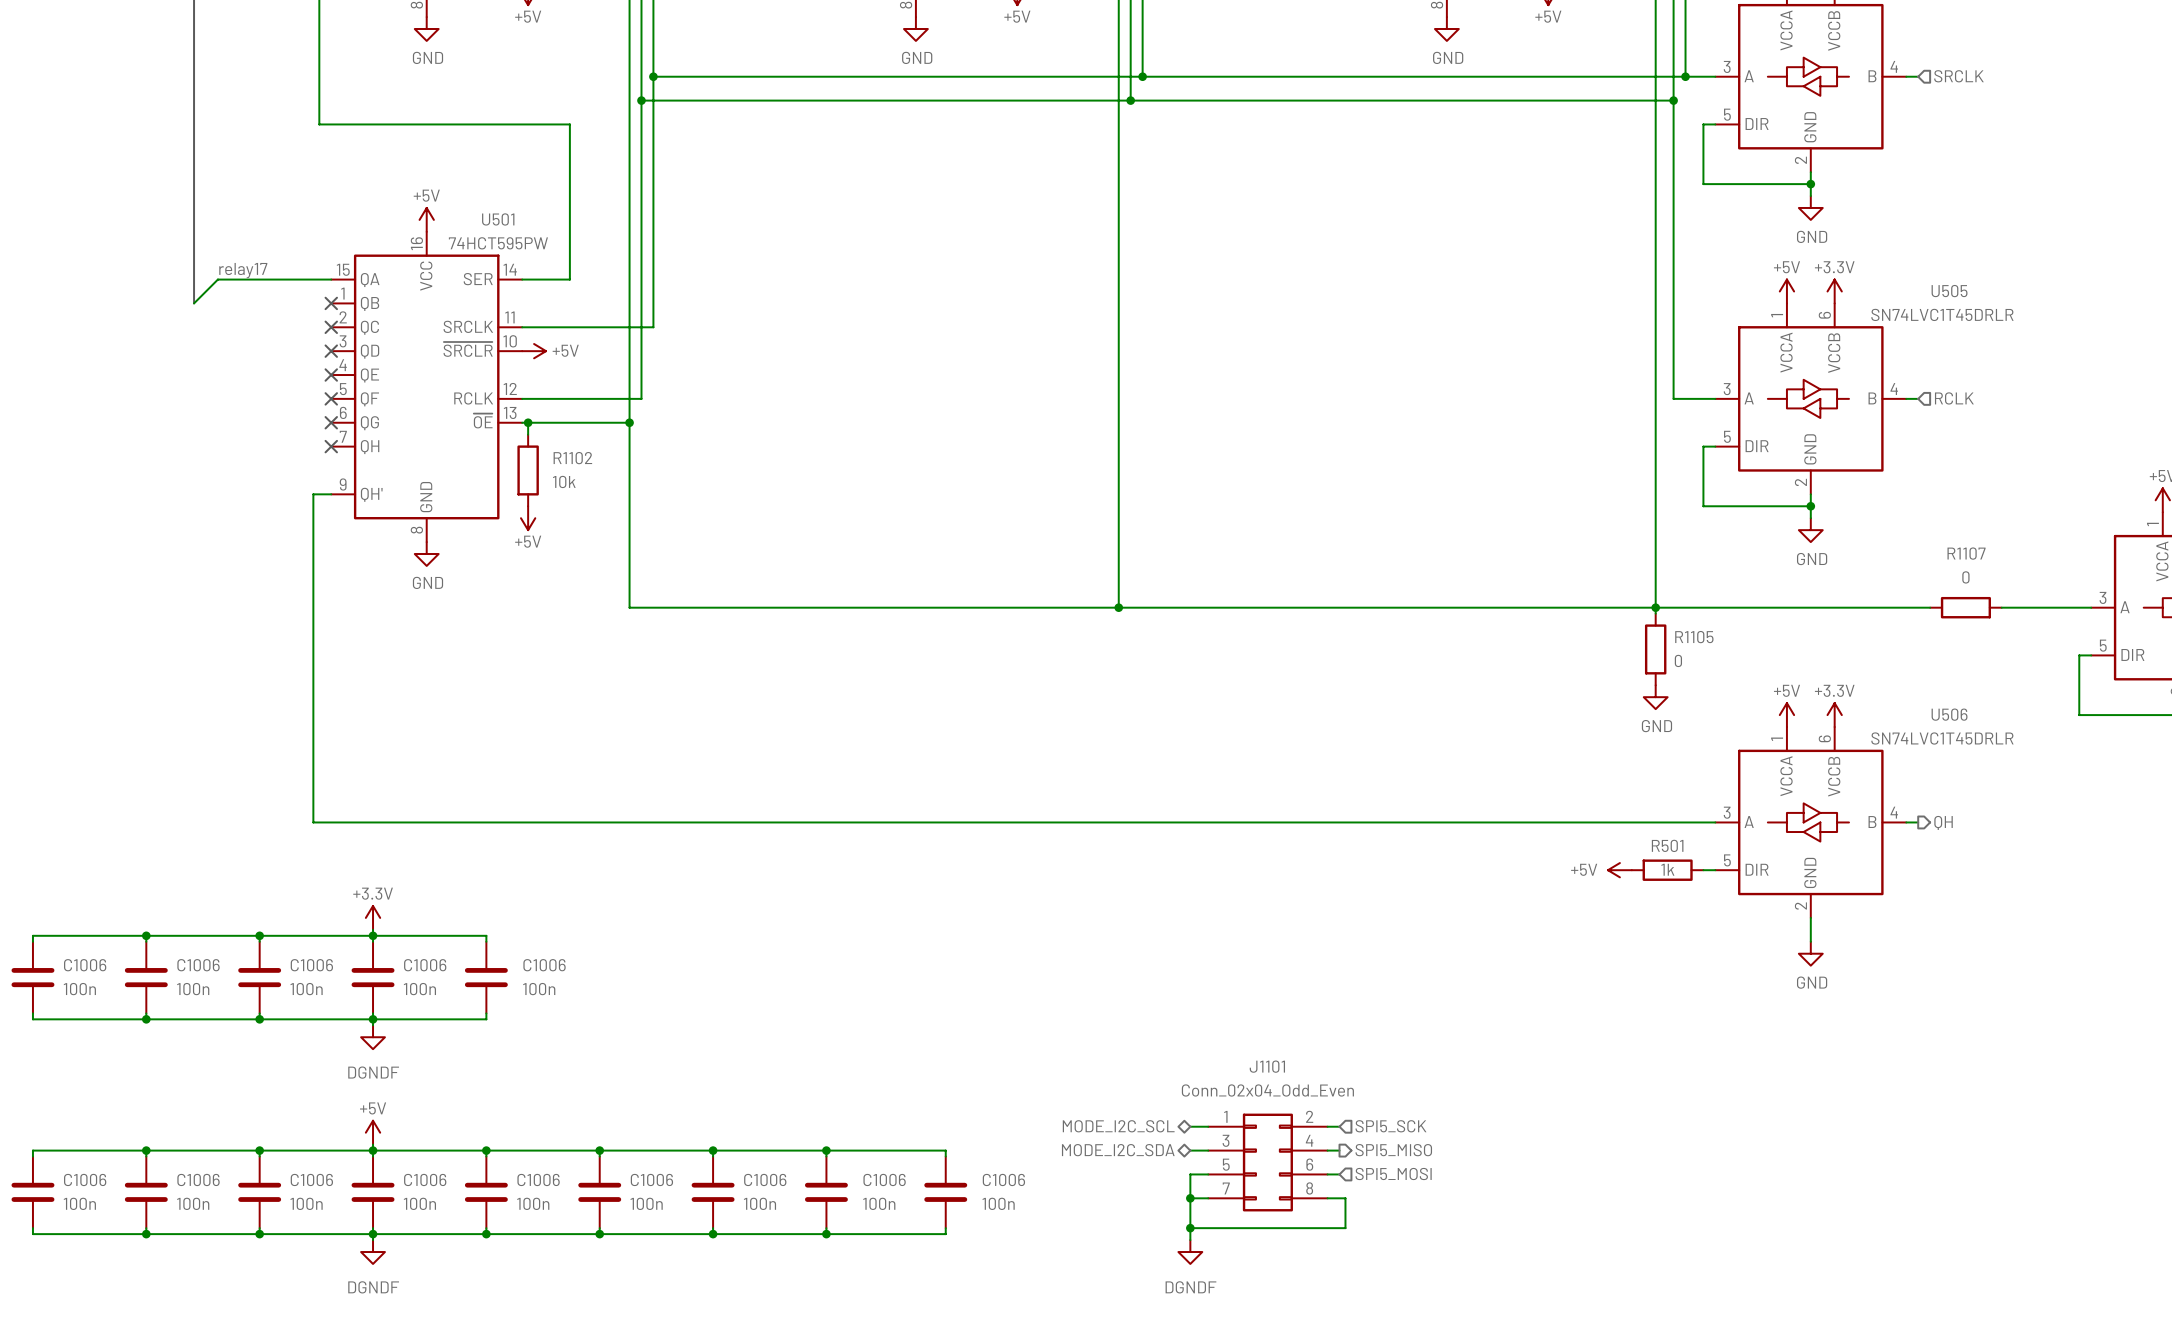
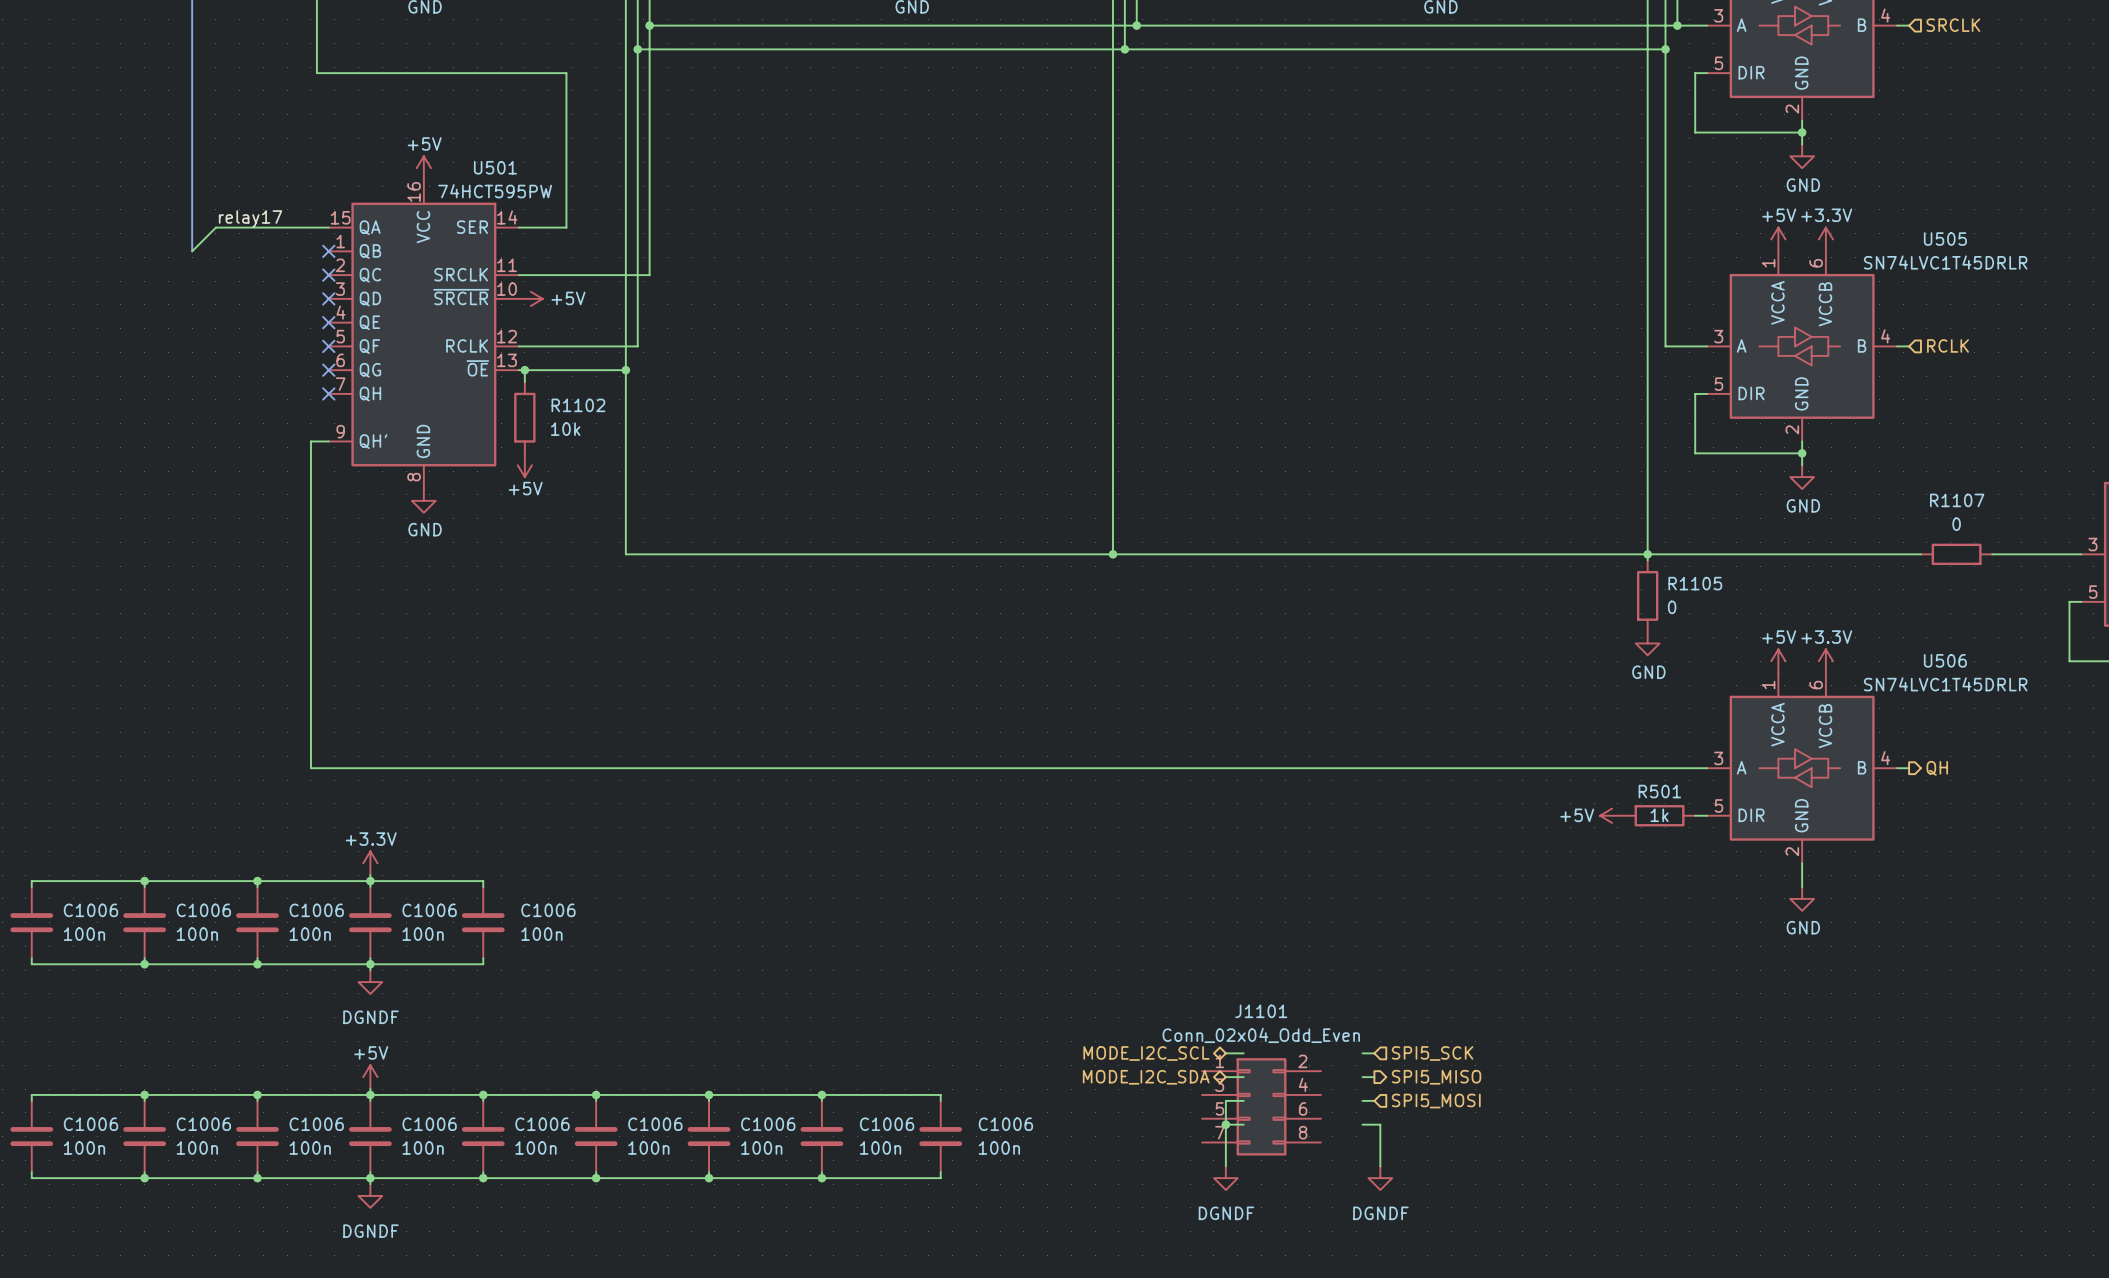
hierarchical label position: MODE_I2C_SCL (1118, 1126) -> MODE_I2C_SCL (1146, 1053)
wire: (1190, 1126) (1208, 1126) -> (1225, 1053) (1243, 1053)
wire: (1327, 1126) (1339, 1126) -> (1362, 1053) (1374, 1053)
hierarchical label position: SPI5_SCK (1390, 1126) -> SPI5_SCK (1432, 1053)
hierarchical label position: MODE_I2C_SDA (1118, 1150) -> MODE_I2C_SDA (1146, 1077)
wire: (1190, 1150) (1208, 1150) -> (1225, 1077) (1243, 1077)
wire: (1327, 1150) (1339, 1150) -> (1362, 1077) (1374, 1077)
hierarchical label position: SPI5_MISO (1393, 1150) -> SPI5_MISO (1436, 1077)
wire: (1208, 1174) (1190, 1174) (1190, 1240) -> (1243, 1100) (1225, 1100) (1225, 1166)
wire: (1327, 1174) (1339, 1174) -> (1362, 1100) (1374, 1100)
hierarchical label position: SPI5_MOSI (1393, 1174) -> SPI5_MOSI (1436, 1101)
junction: none -> (1225, 1124)
wire: none -> (1362, 1124) (1380, 1124) (1380, 1166)
wire: (1190, 1198) (1208, 1198) -> (1225, 1124) (1243, 1124)
junction: (1190, 1198) -> none
wire: (1327, 1198) (1345, 1198) (1345, 1228) (1190, 1228) -> none
junction: (1190, 1228) -> none
power symbol: none -> DGNDF (1380, 1178)
power symbol position: DGNDF (1190, 1252) -> DGNDF (1225, 1178)

